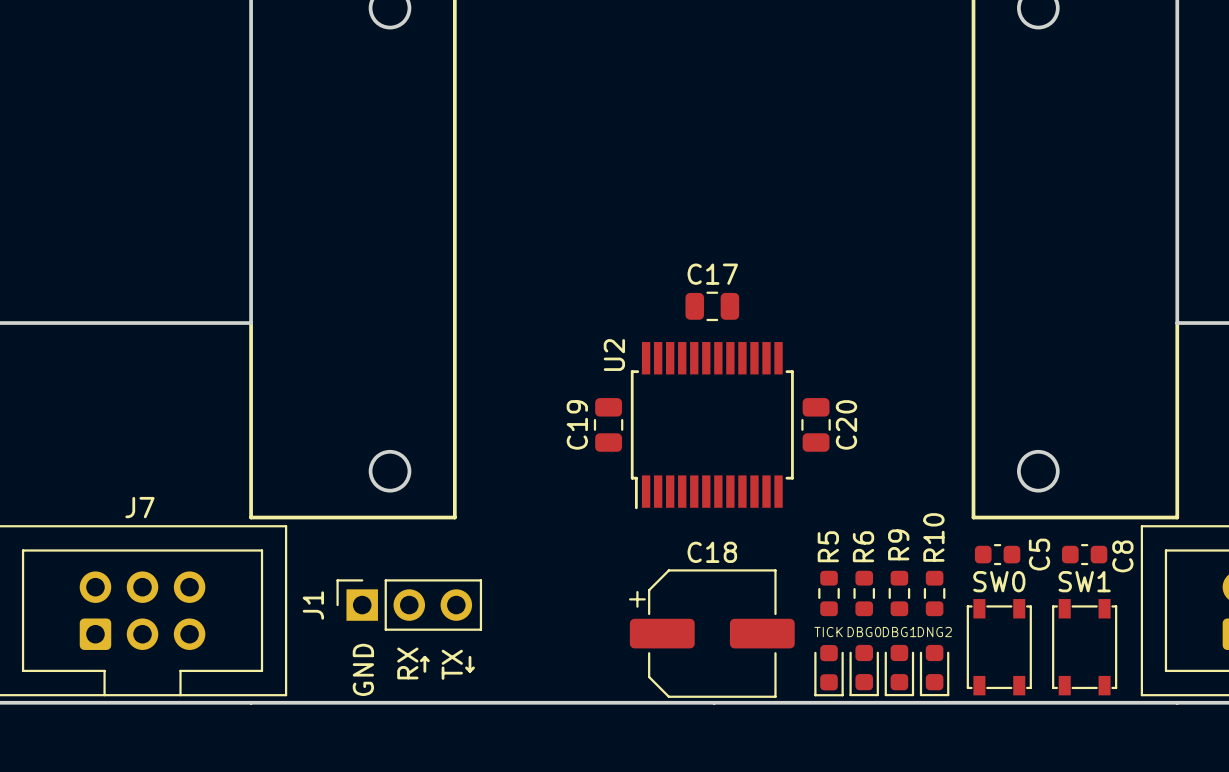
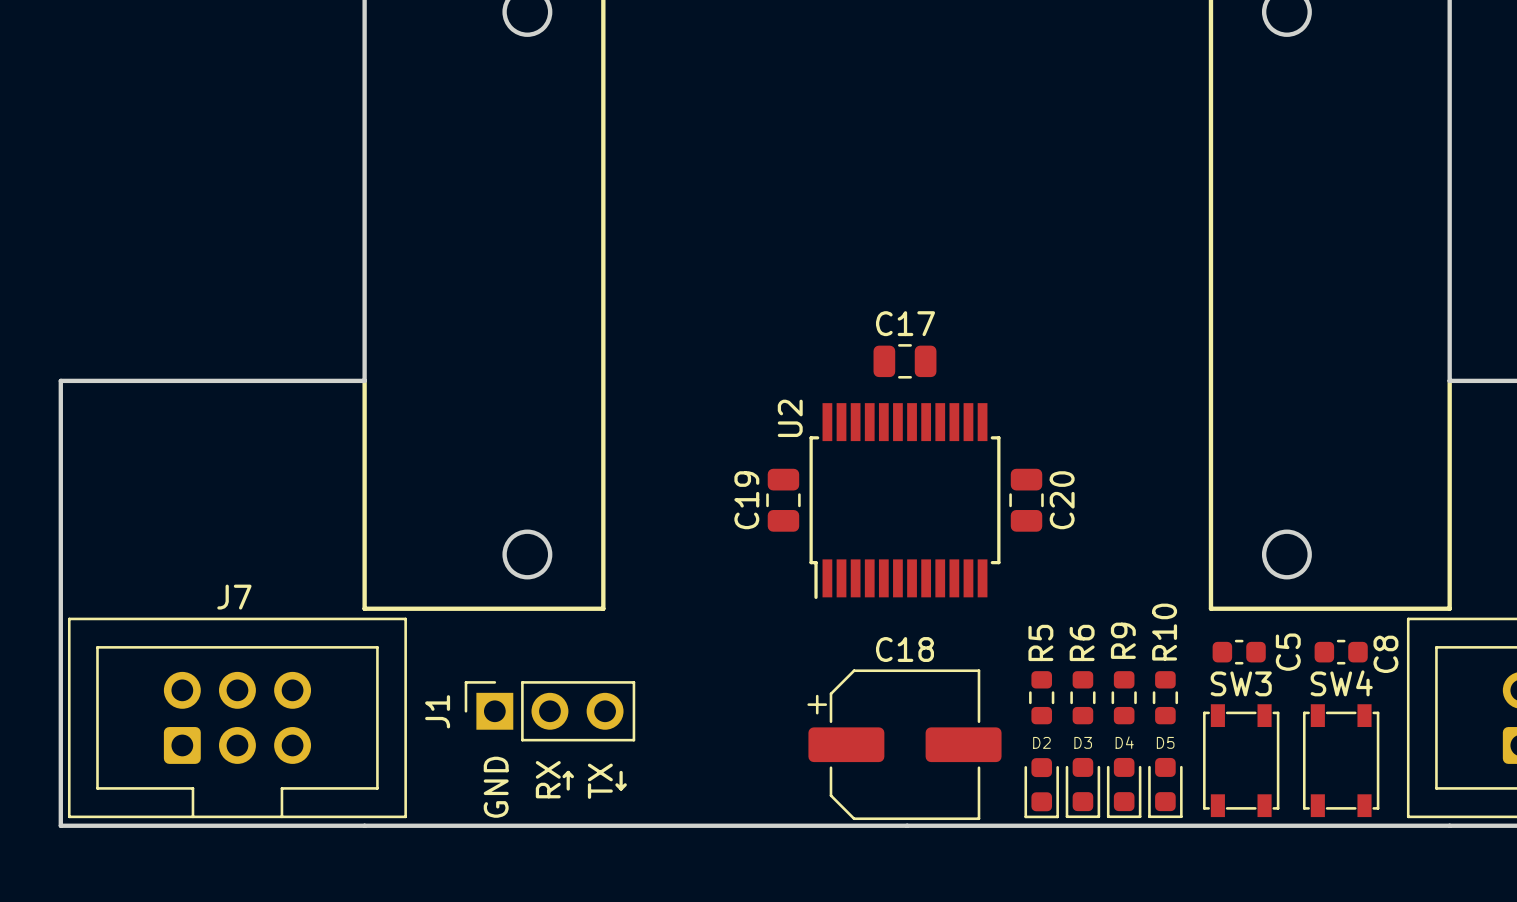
SW0 name: SW0 (999, 581) -> SW3 (1241, 683)
SW1 name: SW1 (1084, 581) -> SW4 (1341, 683)
TICK name: TICK (828, 632) -> D2 (1041, 742)
DBG0 name: DBG0 (864, 632) -> D3 (1083, 742)
DBG1 name: DBG1 (899, 632) -> D4 (1124, 742)
DNG2 name: DNG2 (934, 632) -> D5 (1165, 742)

